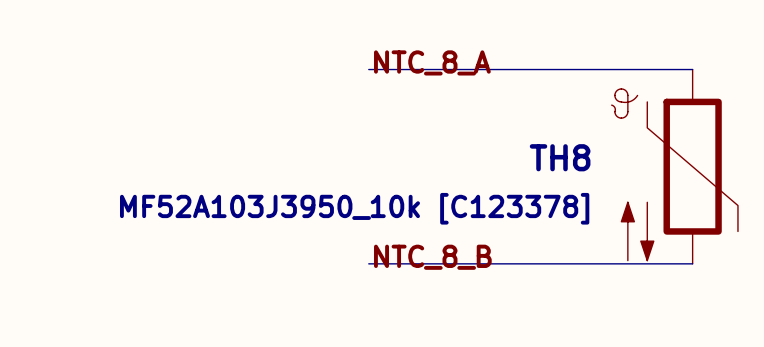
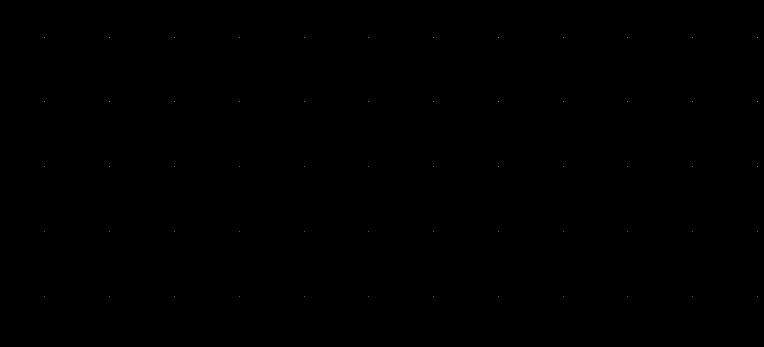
label: NTC_8_A (432, 62) -> none
wire: (368, 69) (692, 69) -> none
TH8: MF52A103J3950_10k [C123378] (674, 166) -> none
label: NTC_8_B (432, 257) -> none
wire: (368, 263) (692, 263) -> none

